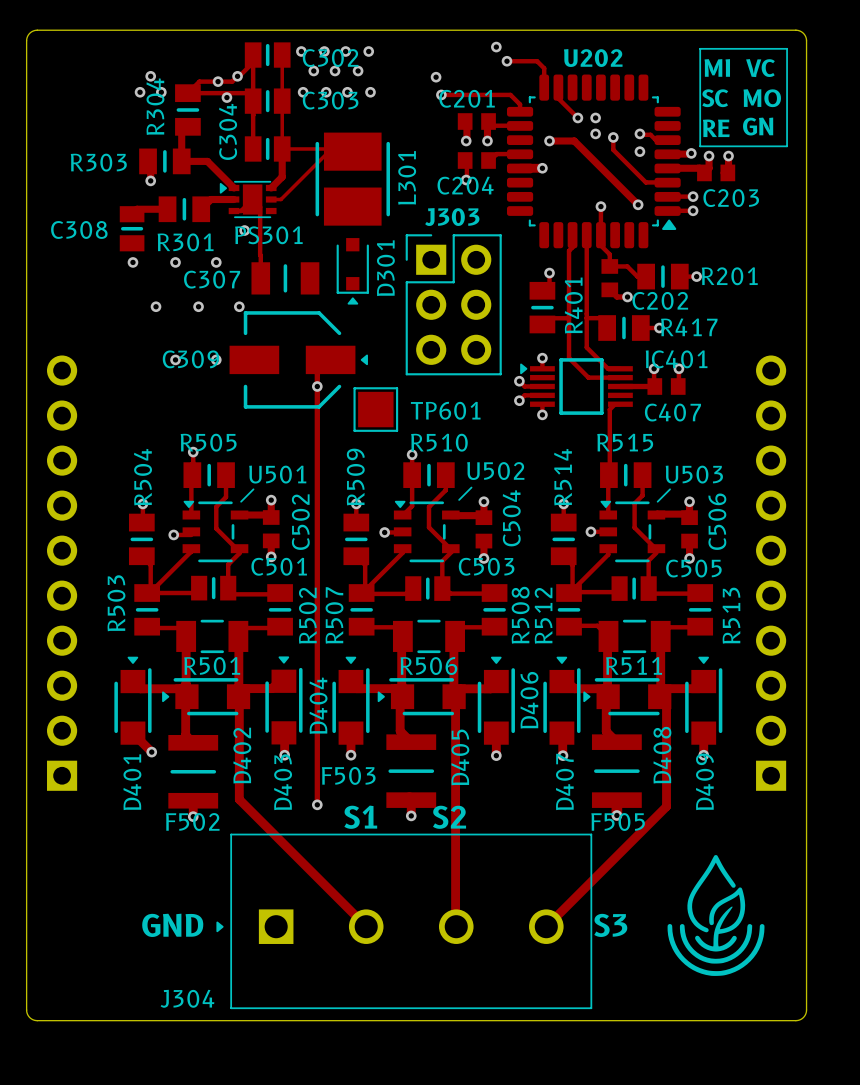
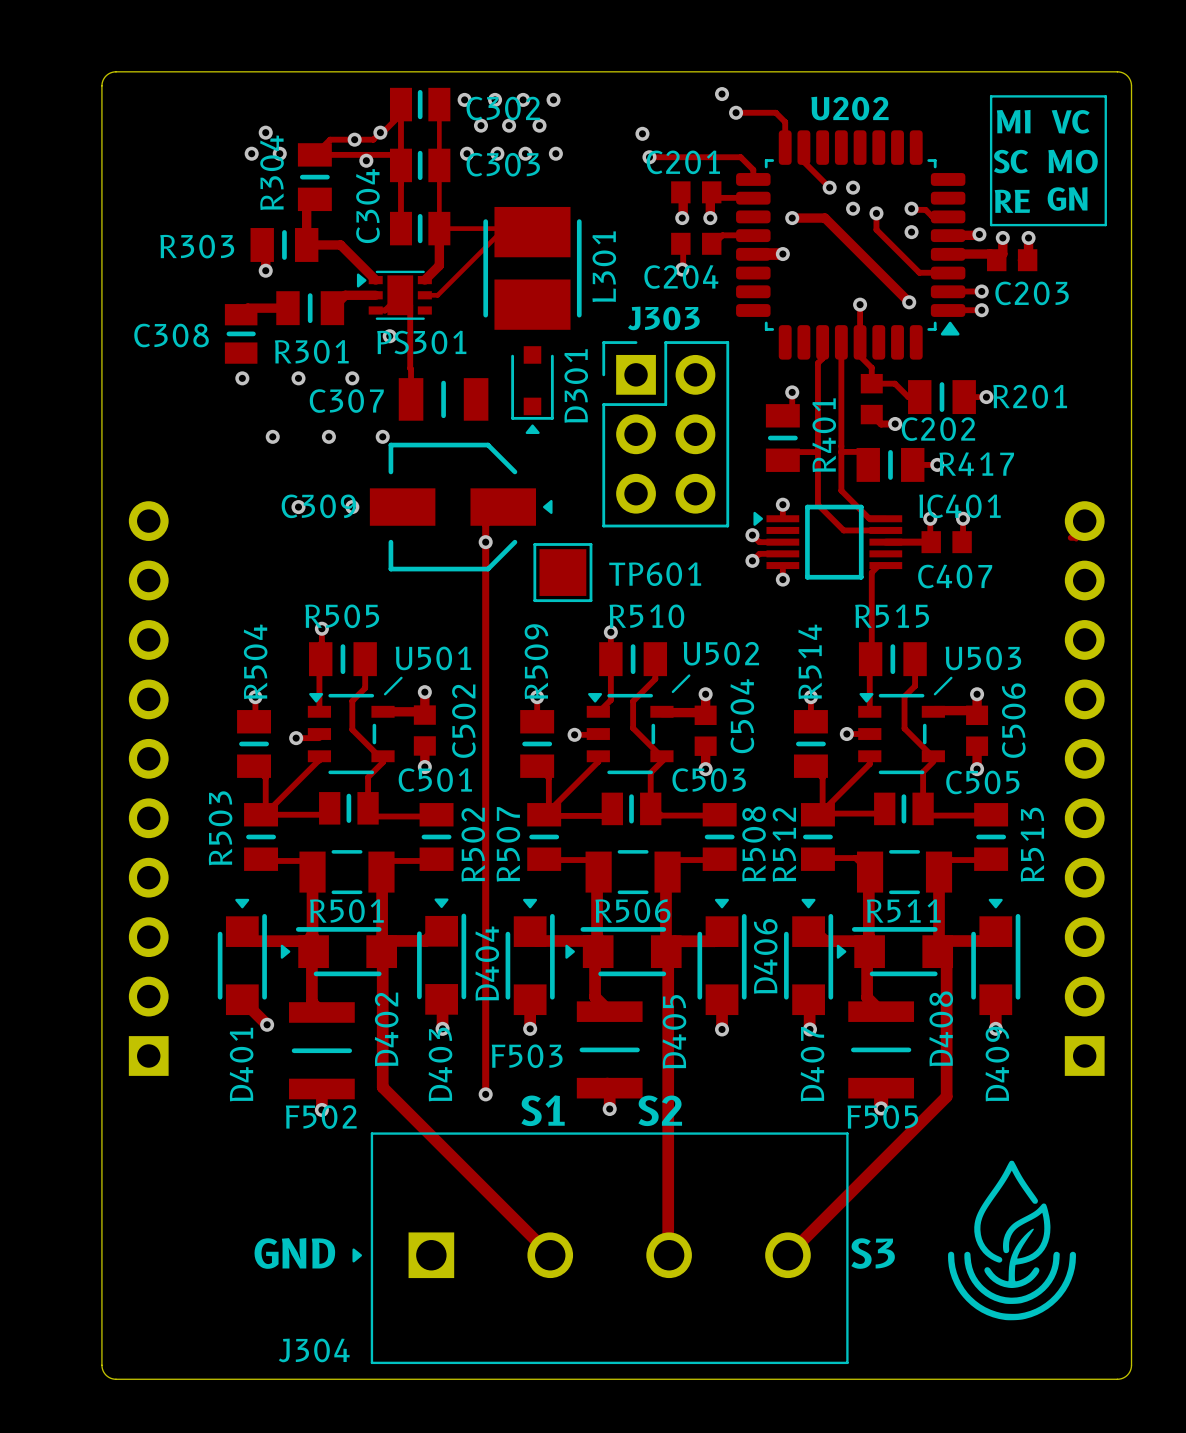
track: none -> (1070, 537) (1076, 539)

